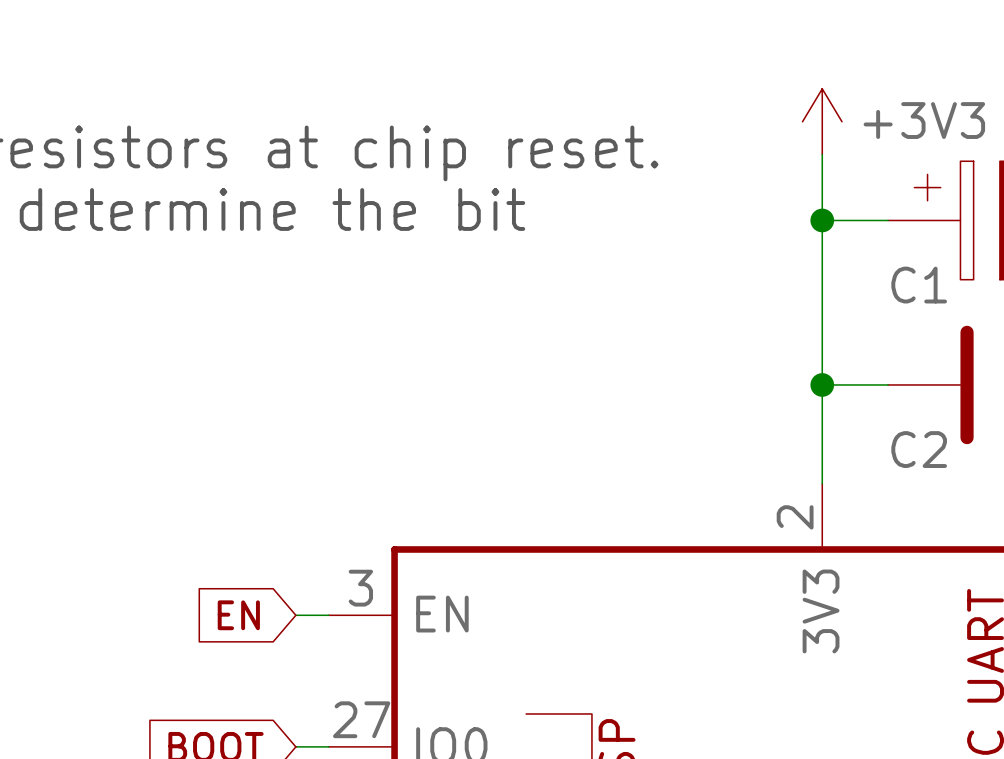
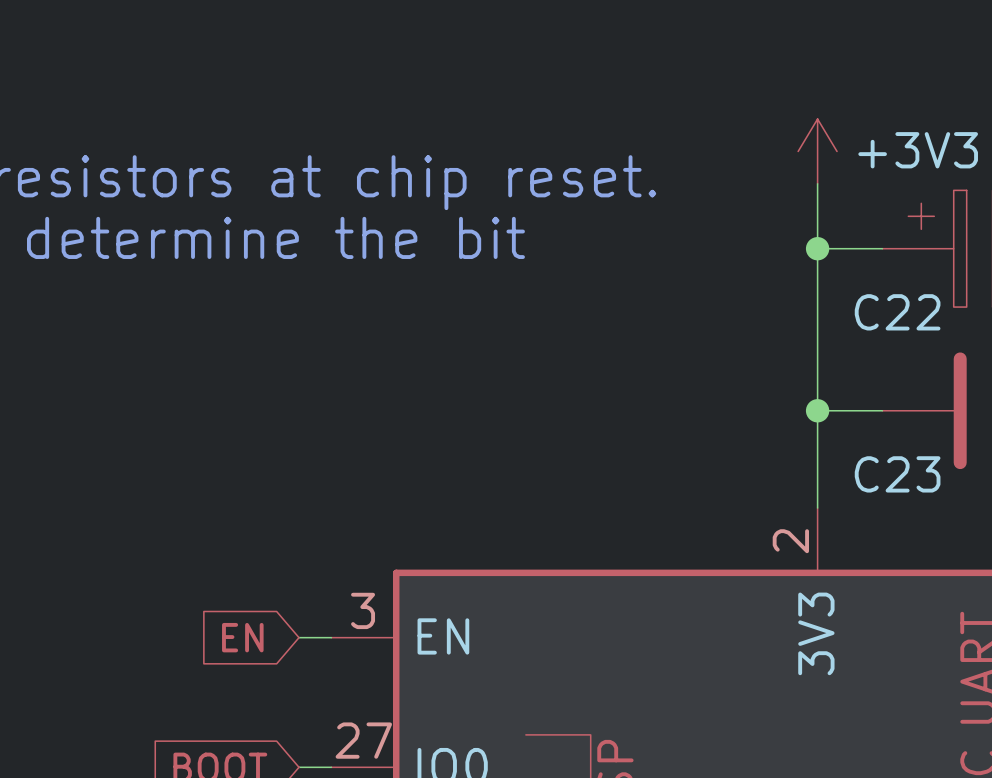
C1 name: C1 (919, 285) -> C22 (897, 312)
C2 name: C2 (919, 449) -> C23 (897, 474)

